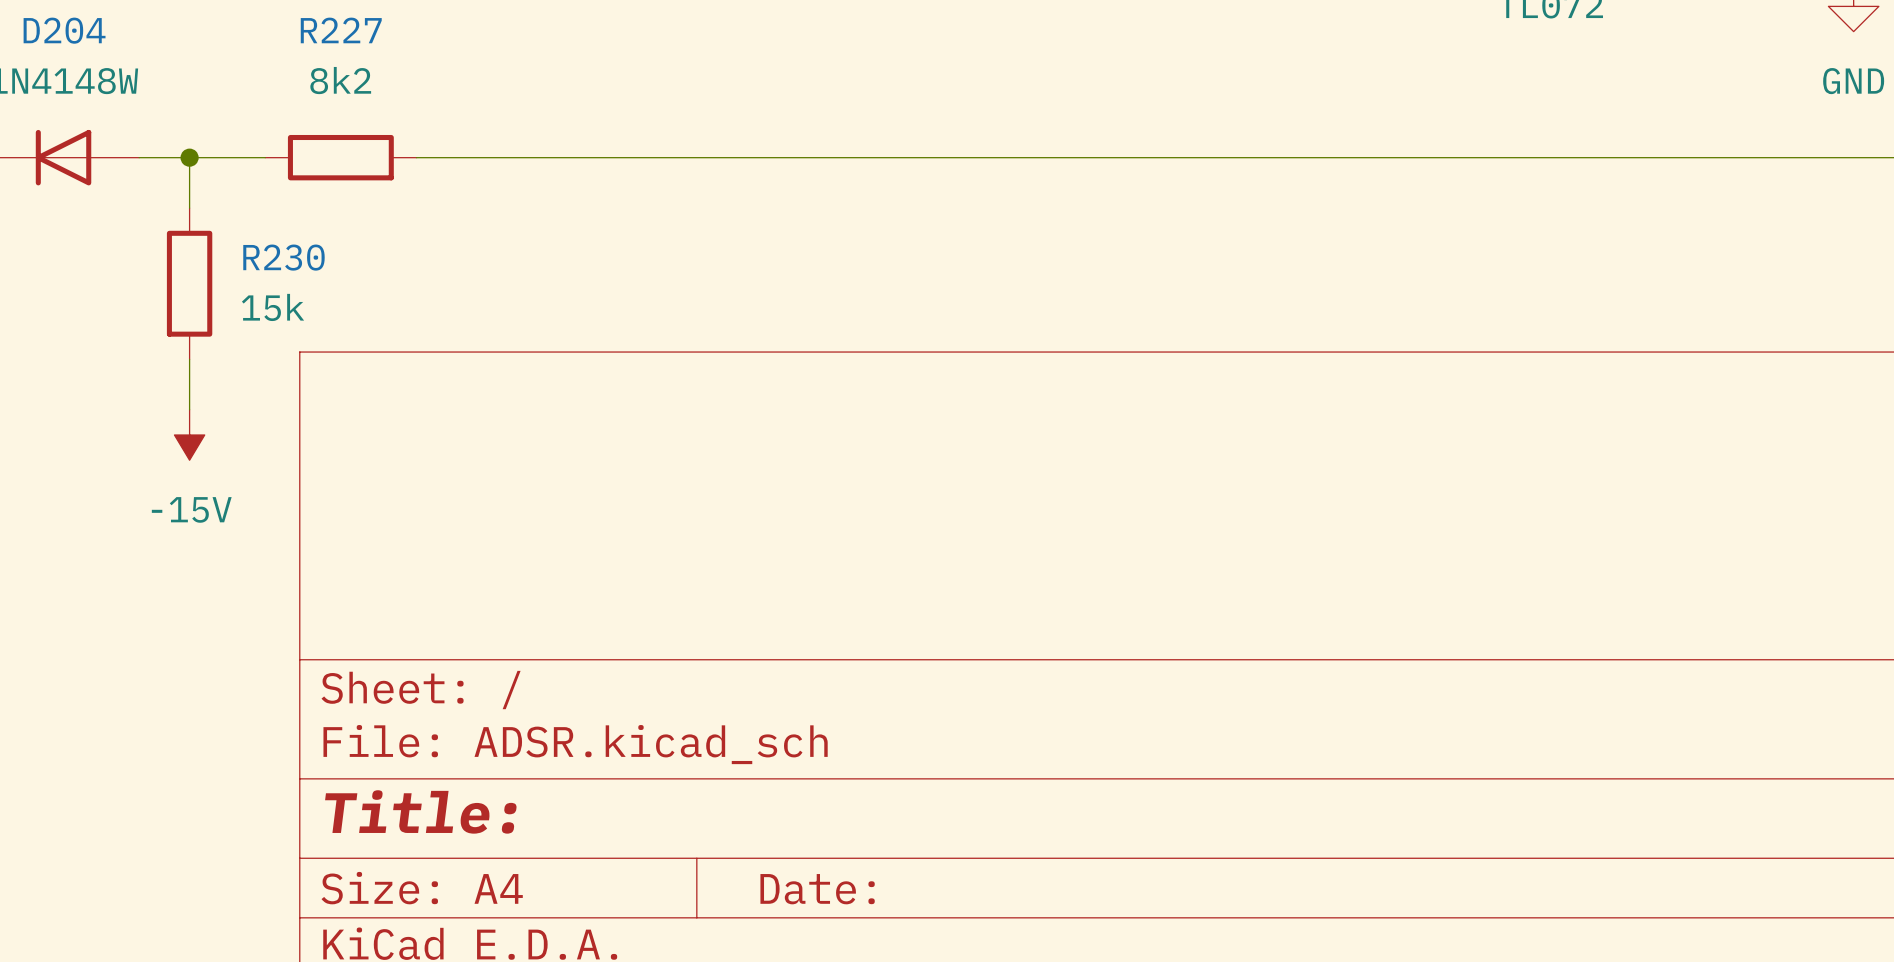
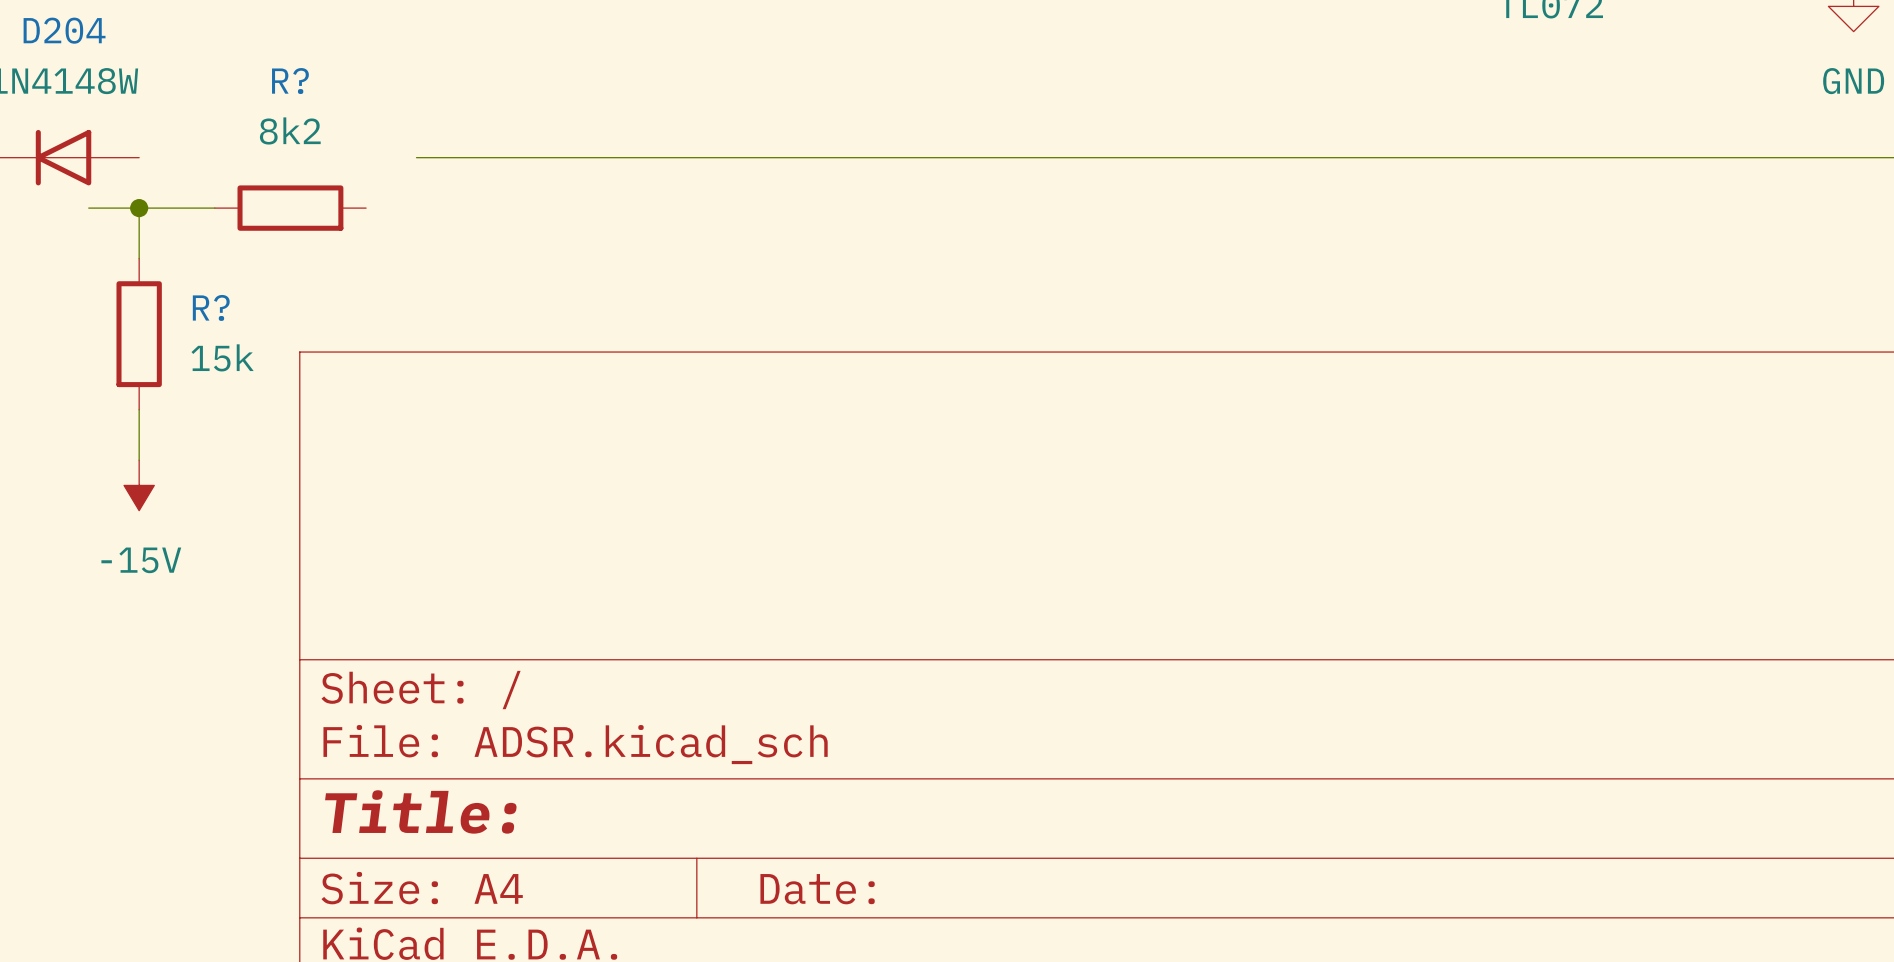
wire: (139, 157) (265, 157) -> (88, 208) (214, 208)
wire: (189, 157) (189, 208) -> (139, 208) (139, 258)
junction position: (189, 157) -> (139, 208)
R227: 8k2 (340, 157) -> none
R?: none -> 8k2 (290, 208)
R230: 15k (189, 283) -> none
R?: none -> 15k (139, 334)
wire: (189, 359) (189, 409) -> (139, 409) (139, 460)
power symbol position: -15V (189, 435) -> -15V (139, 485)

